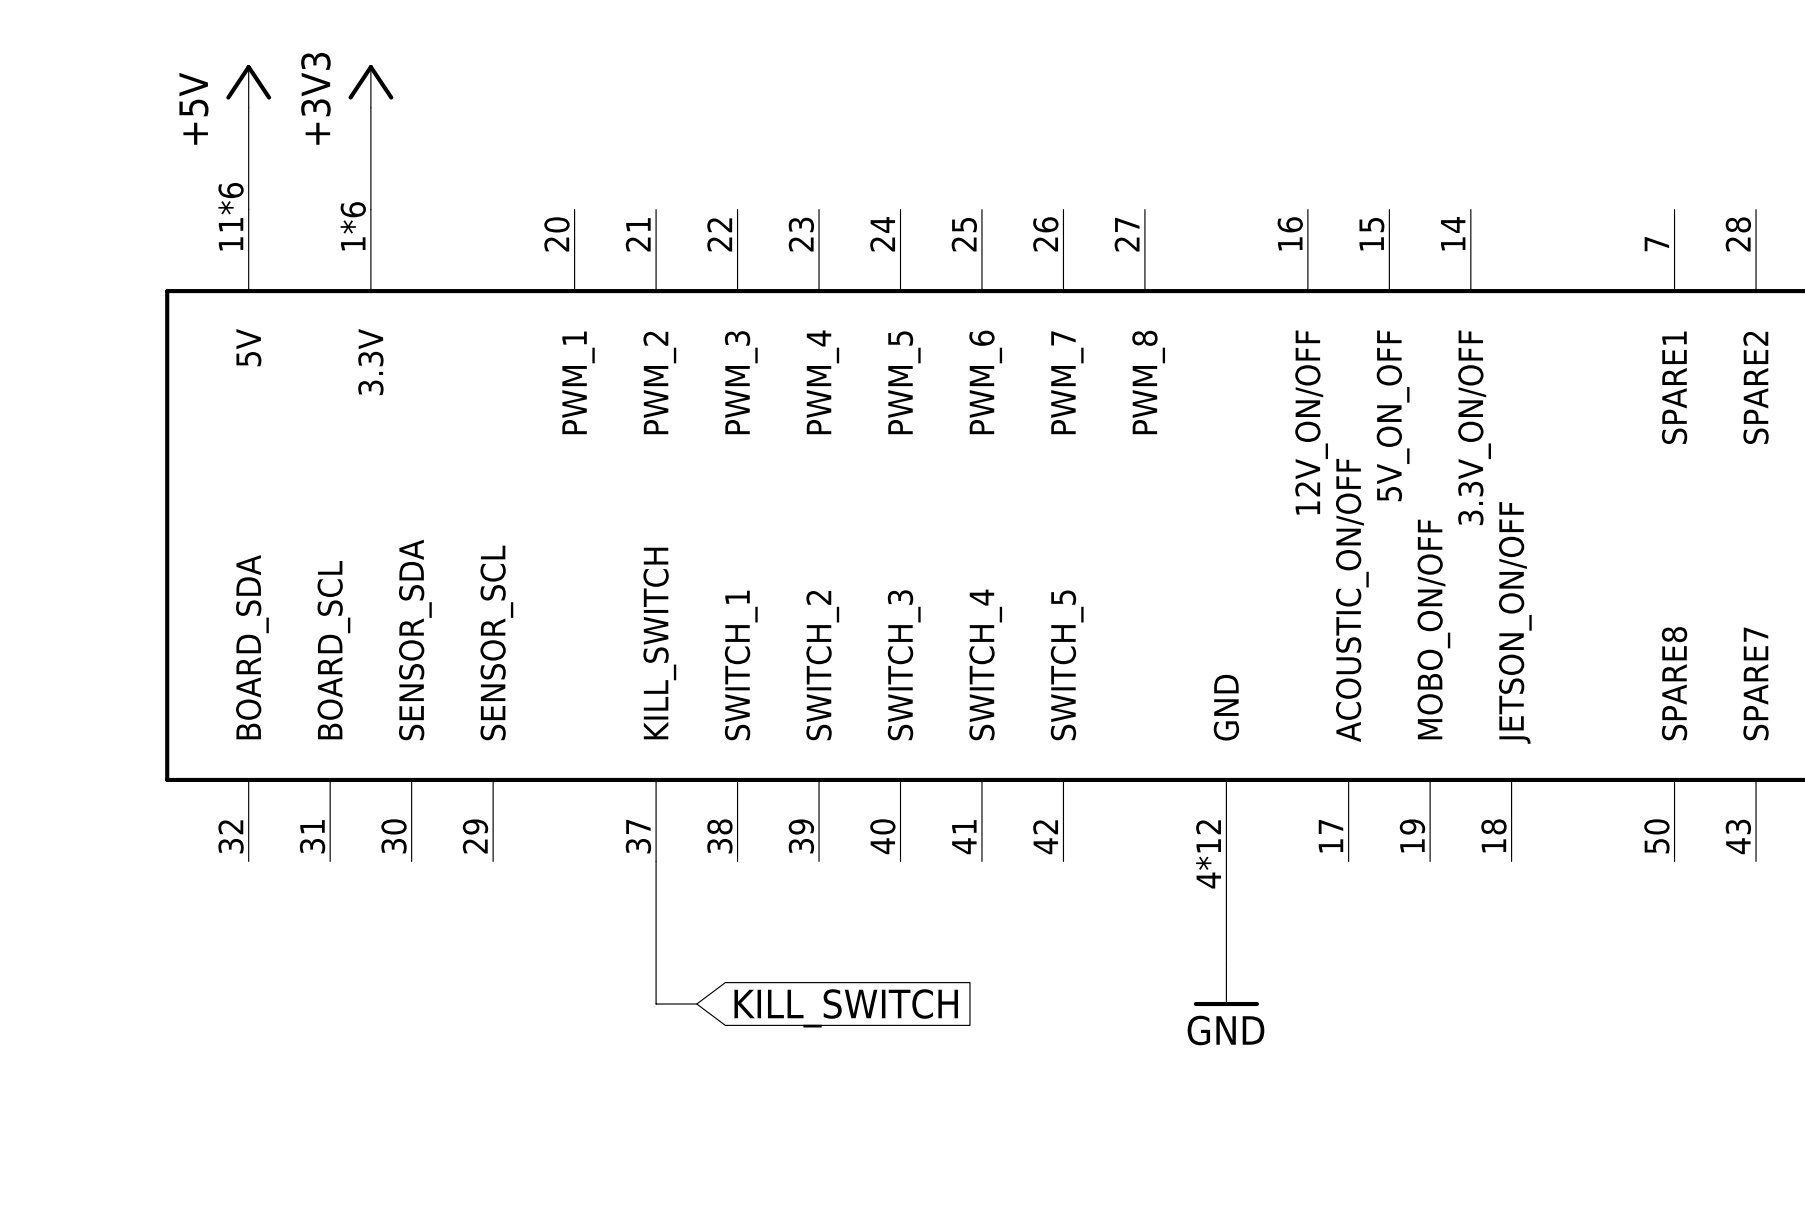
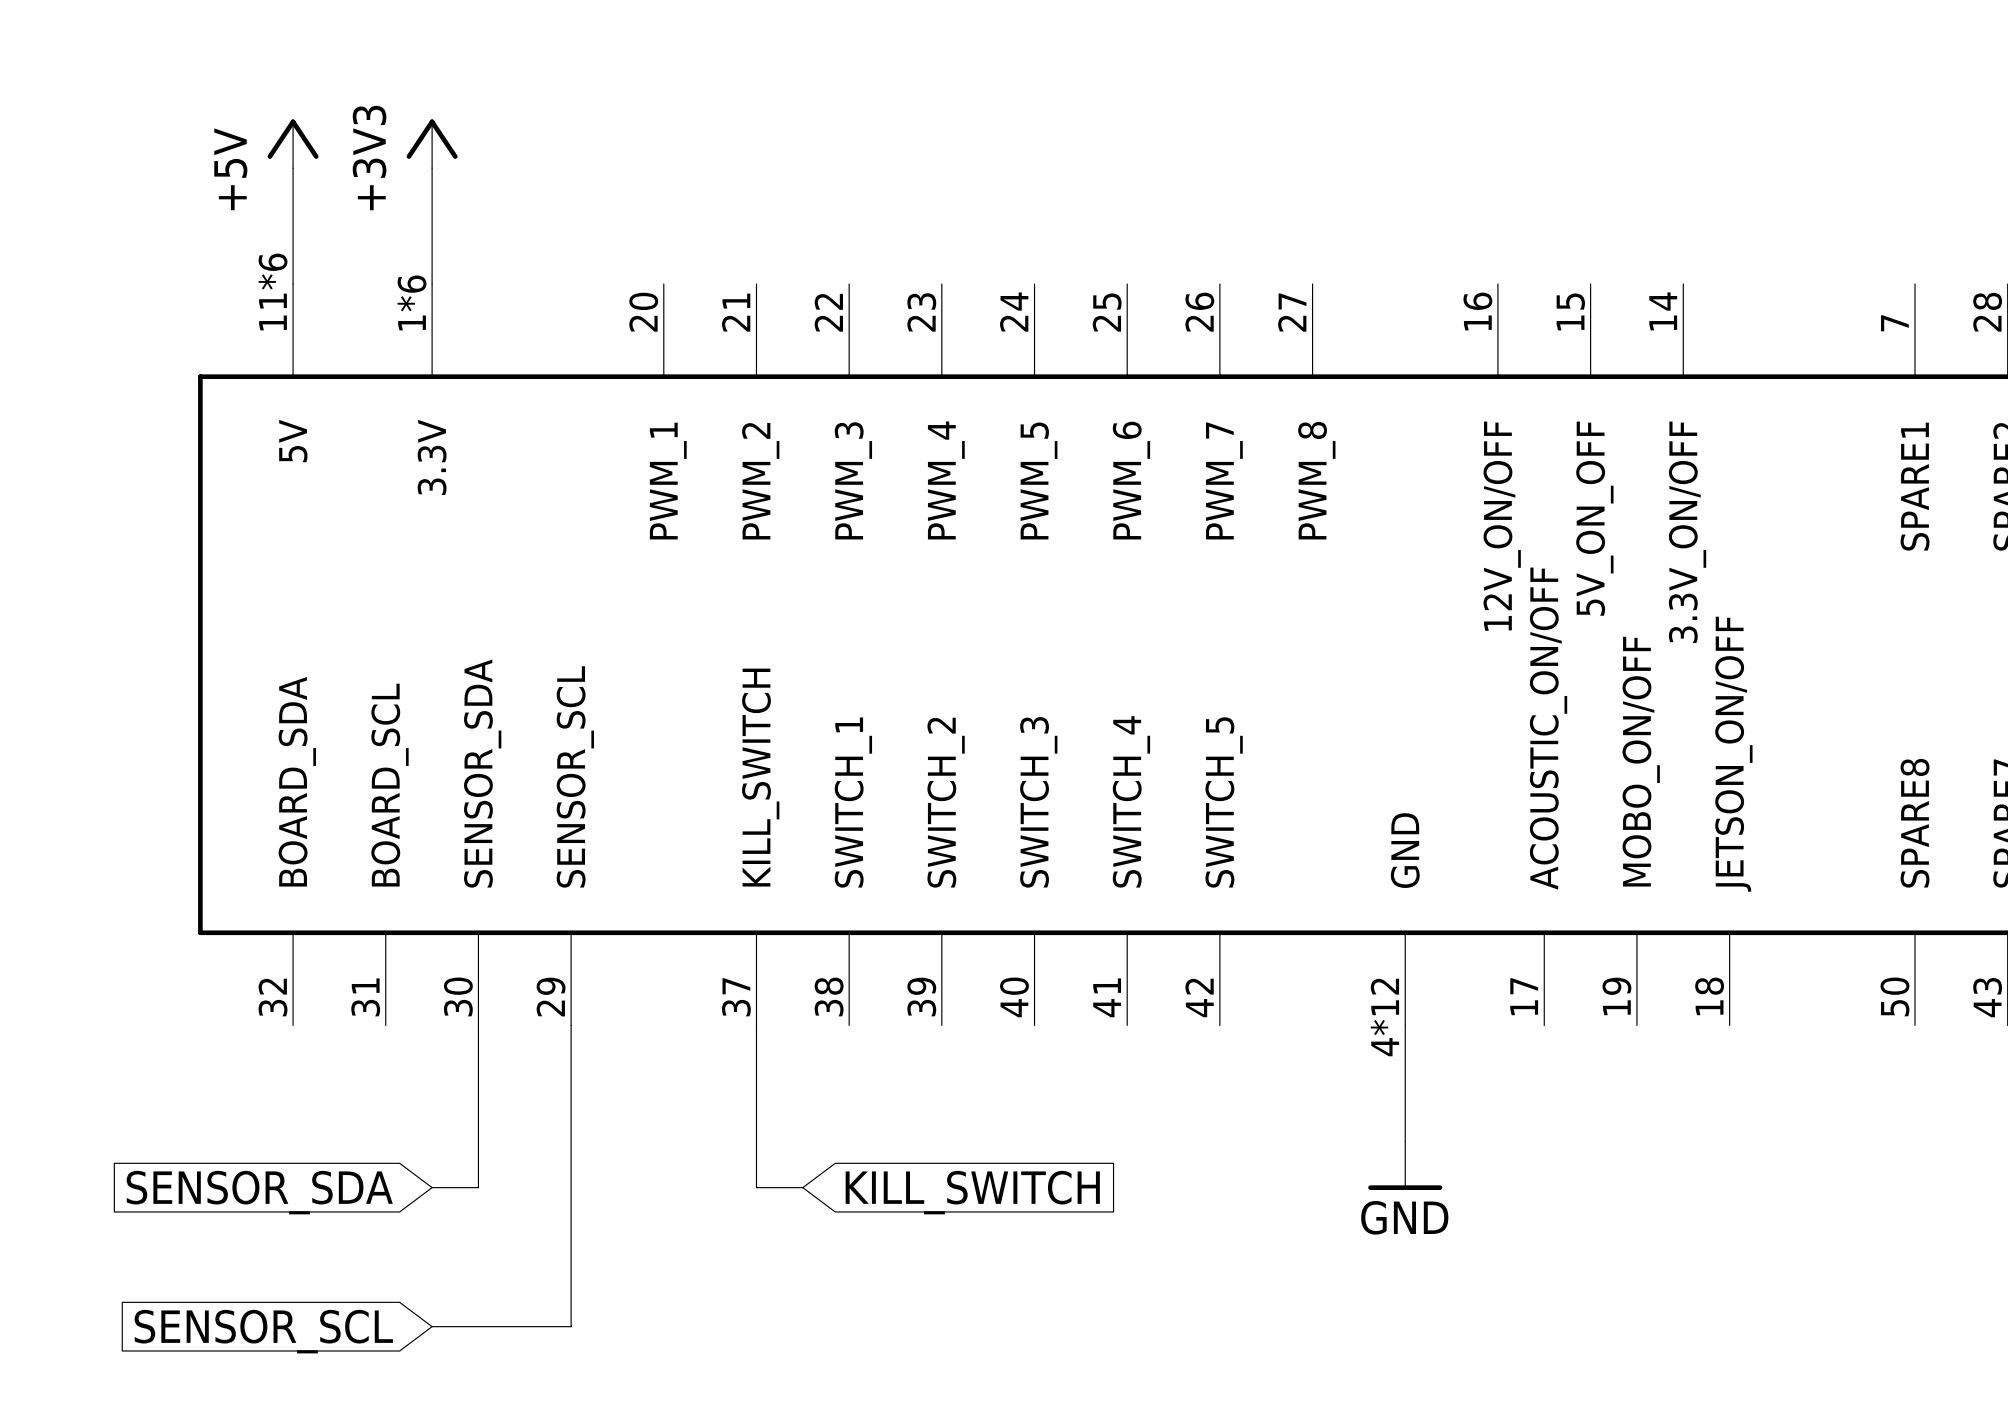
wire: none -> (478, 1025) (478, 1187) (432, 1187)
wire: none -> (571, 1025) (571, 1326) (432, 1326)
global label: none -> SENSOR_SDA (259, 1192)
global label: none -> SENSOR_SCL (263, 1331)

